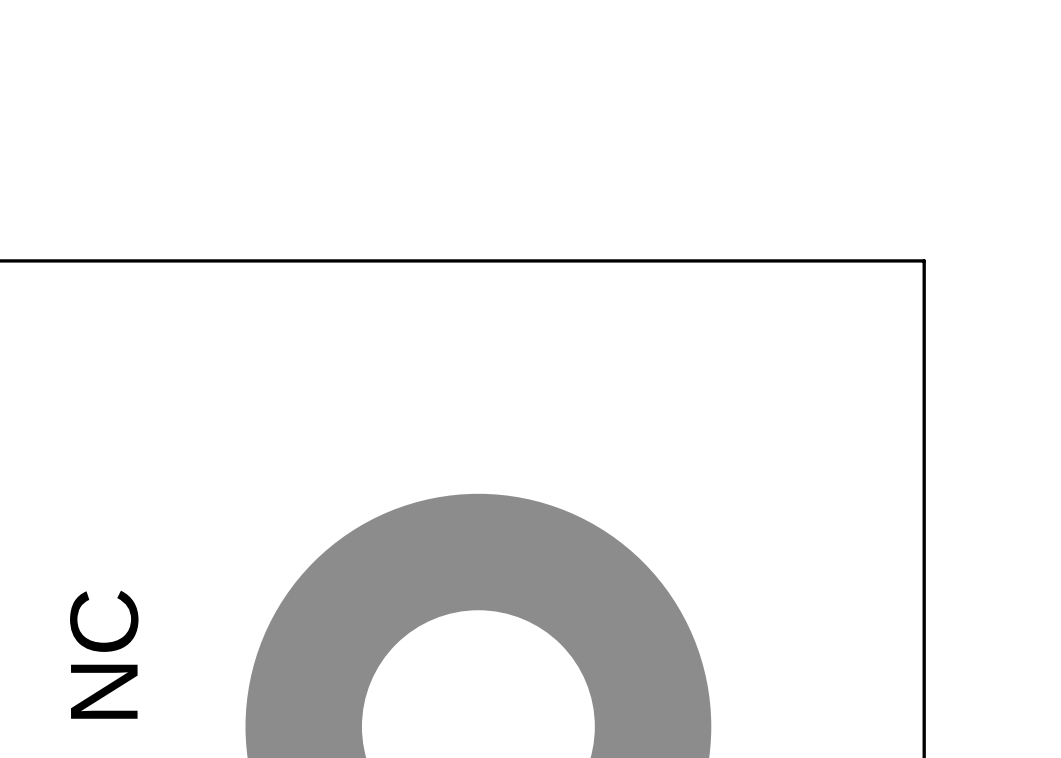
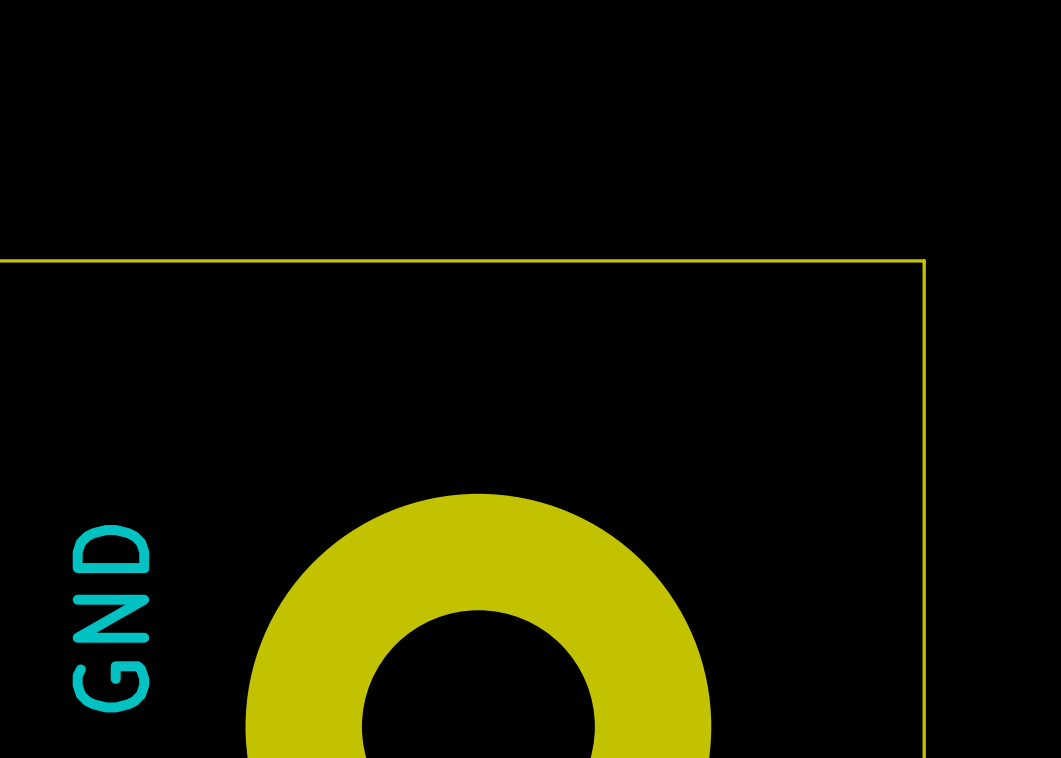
text: NC (104, 654) -> GND (110, 618)

